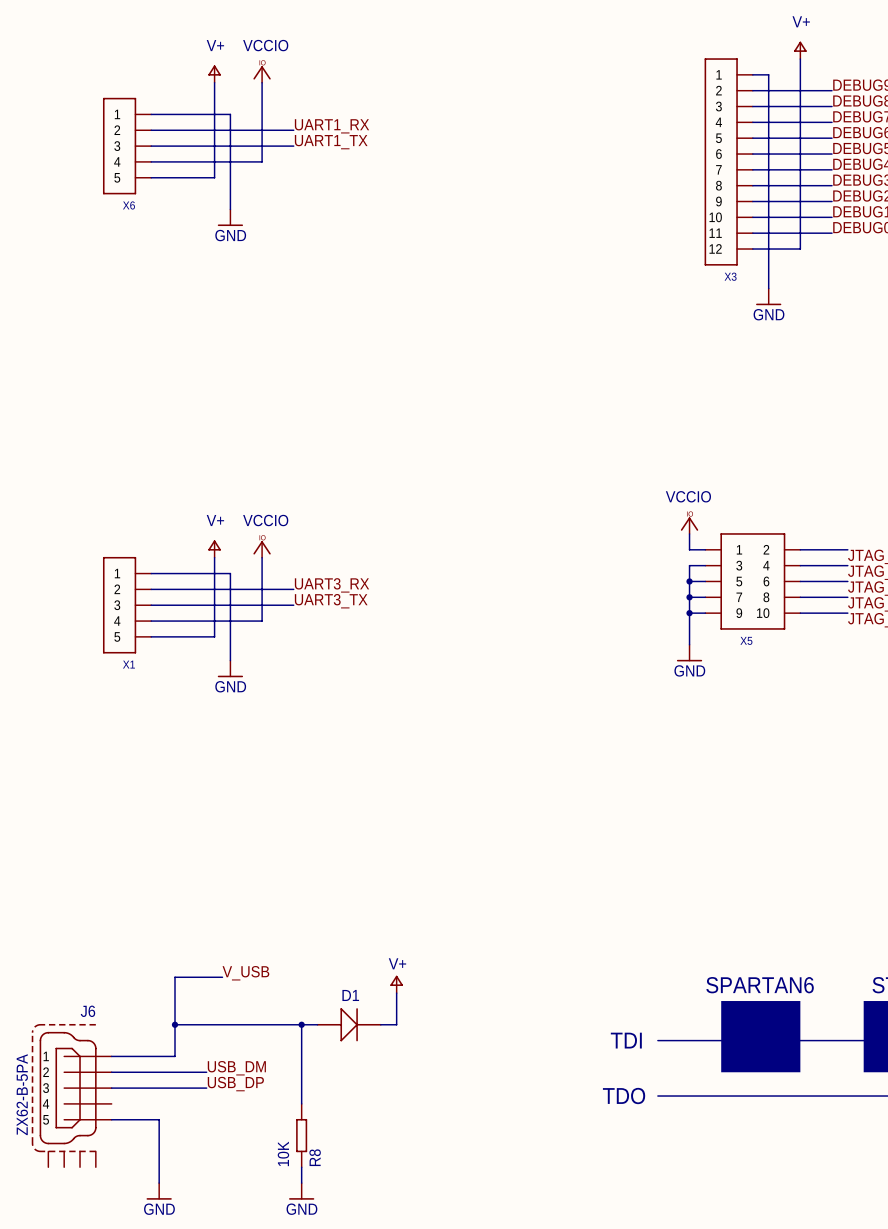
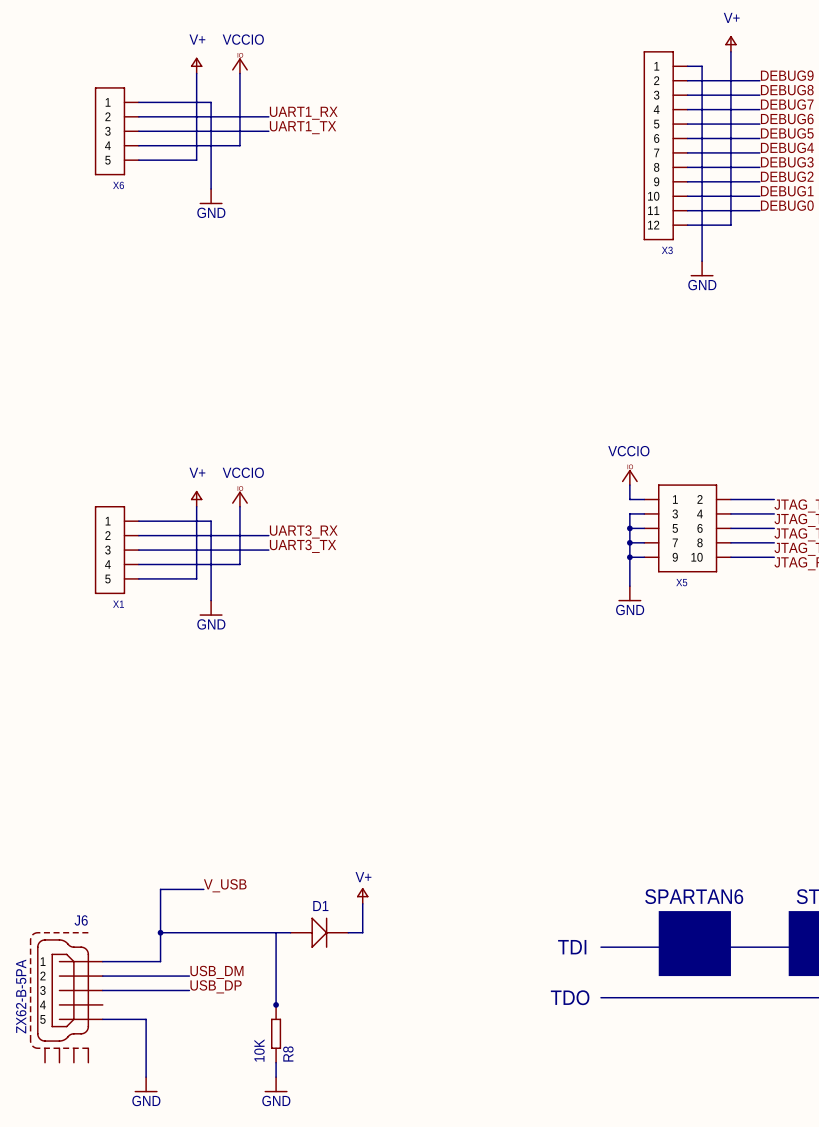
junction: (301, 1024) -> none
junction: none -> (276, 1004)

